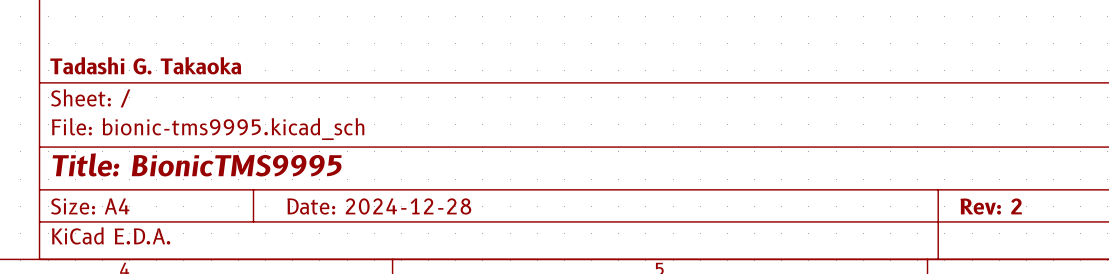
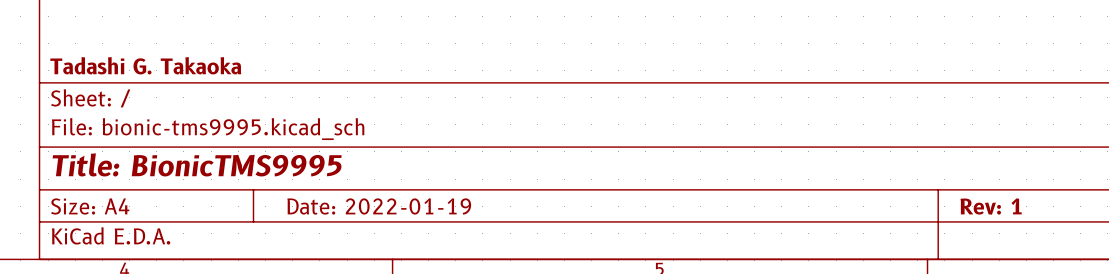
title block: Date: 2024-12-28 (379, 206) -> Date: 2022-01-19 (379, 206)
title block: Rev: 2 (991, 206) -> Rev: 1 (991, 206)

